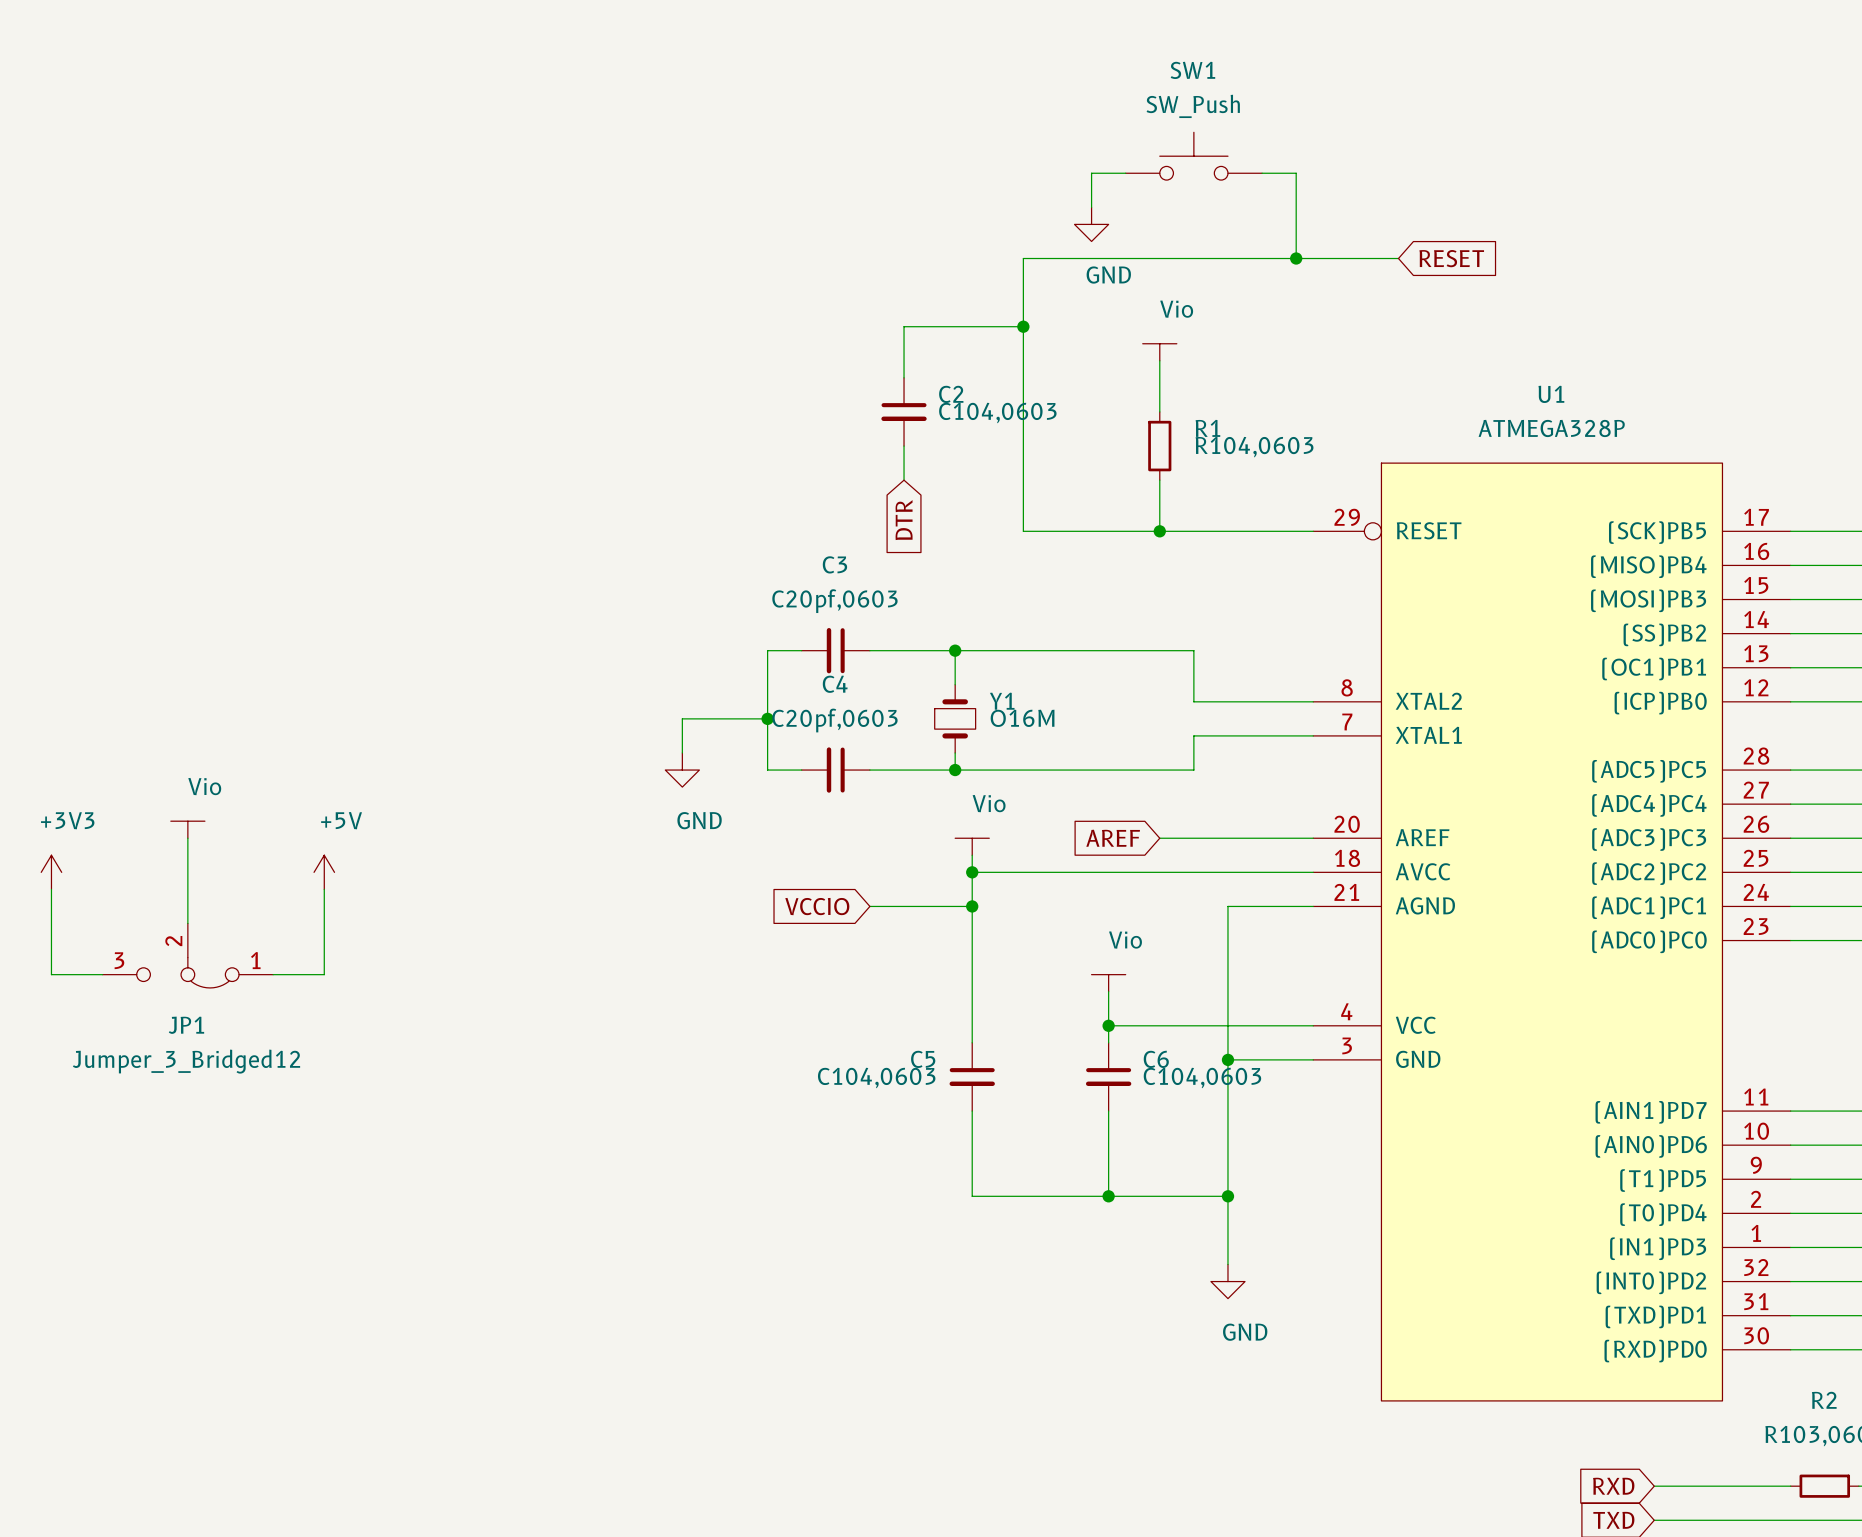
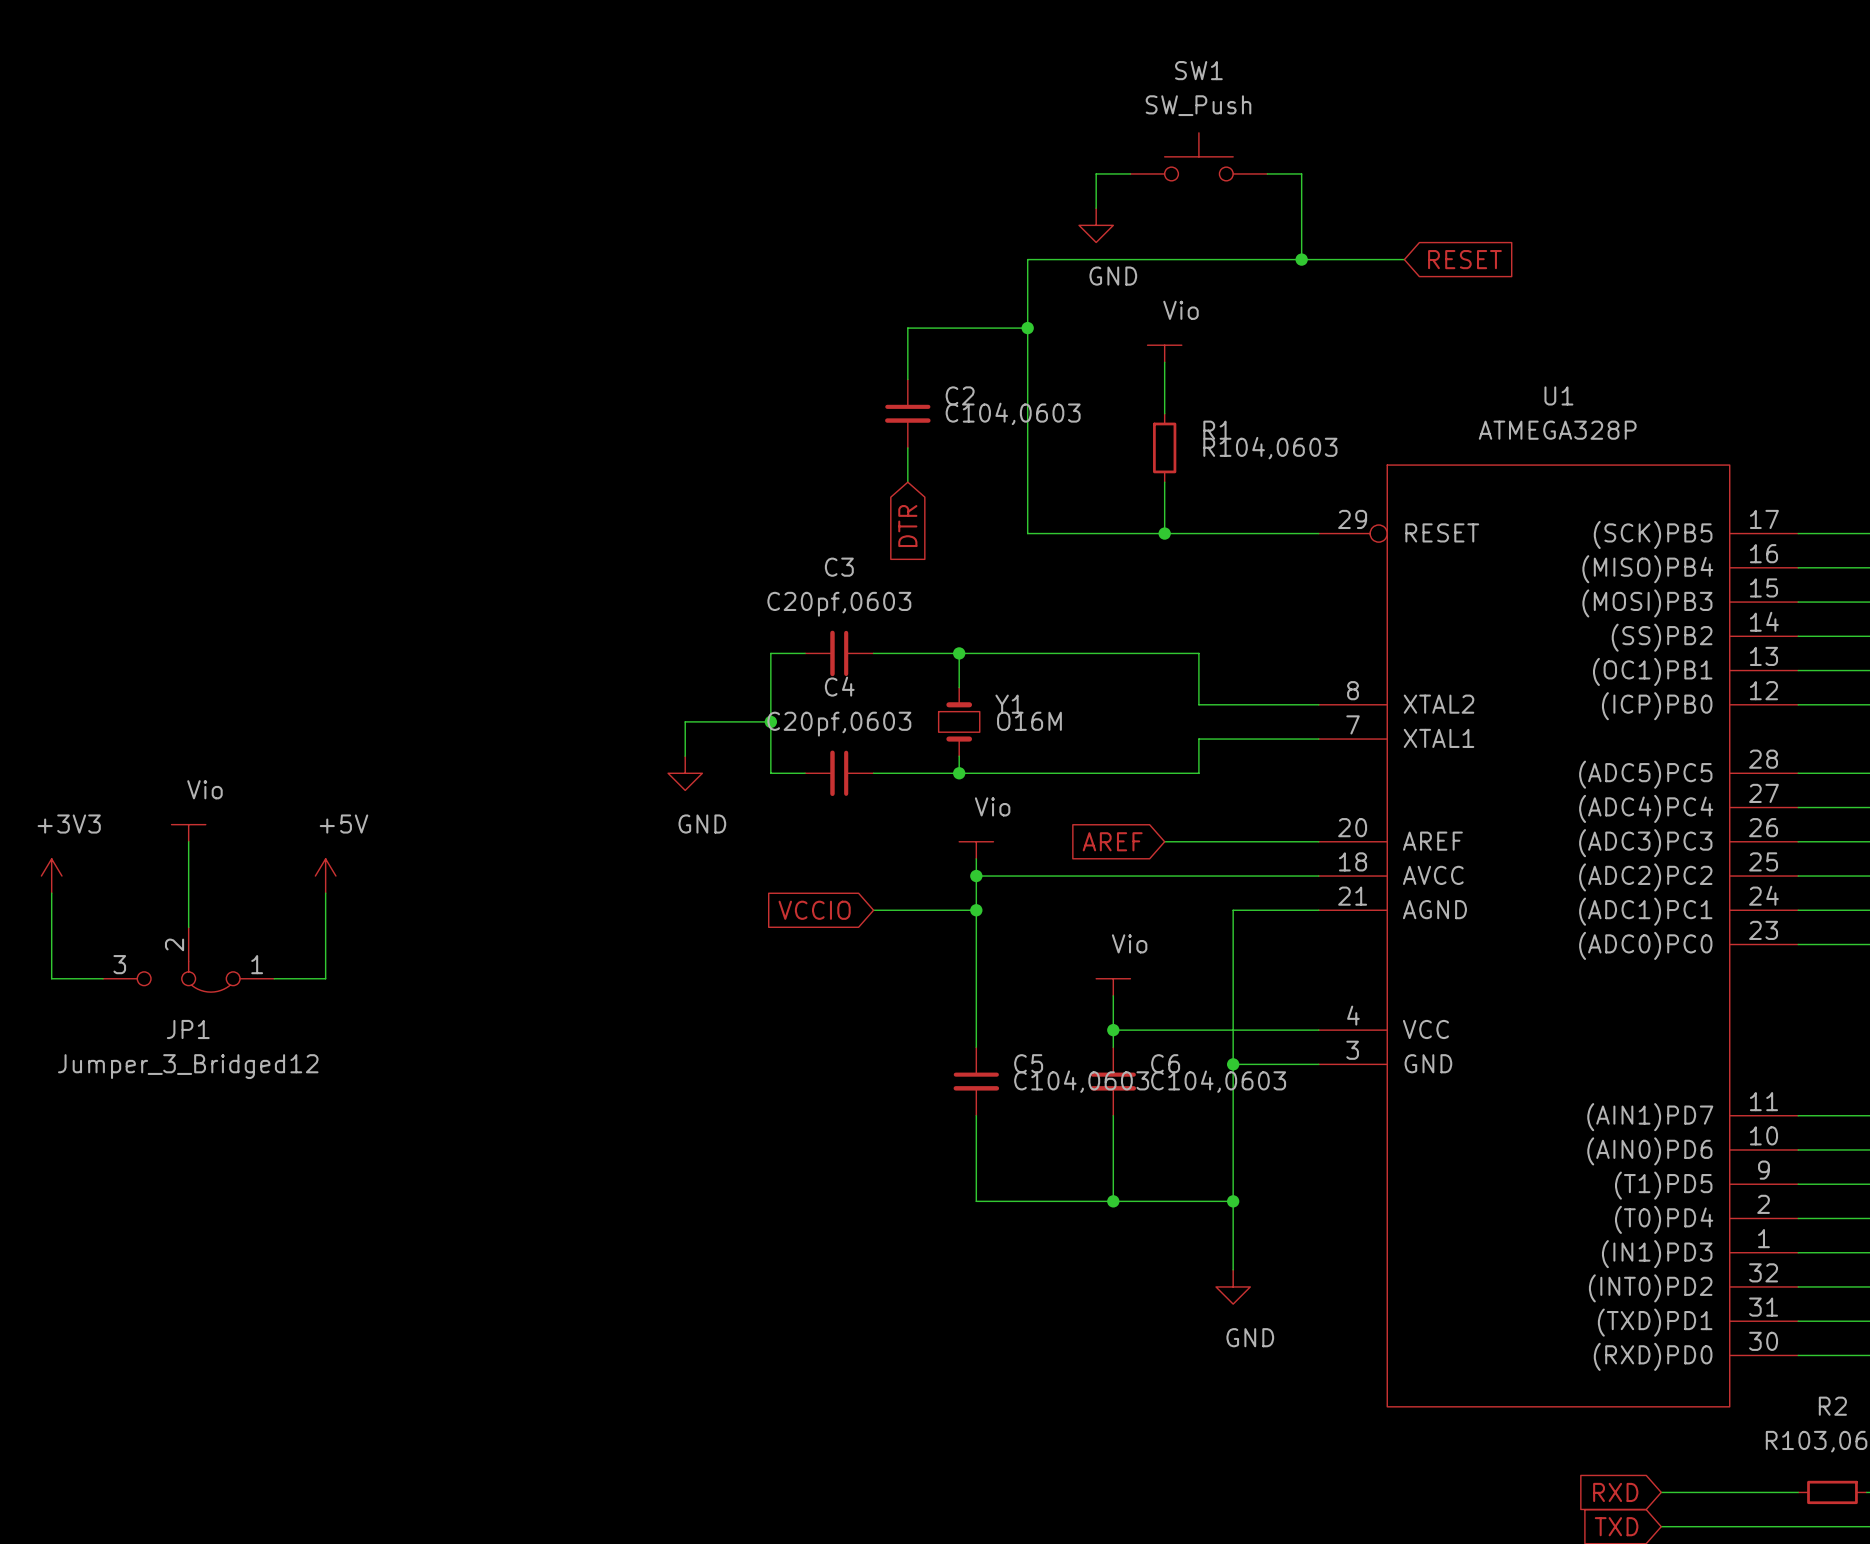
C5 name position: C5 (923, 1059) -> C5 (1028, 1063)
C5 value position: C104,0603 (876, 1078) -> C104,0603 (1081, 1081)

